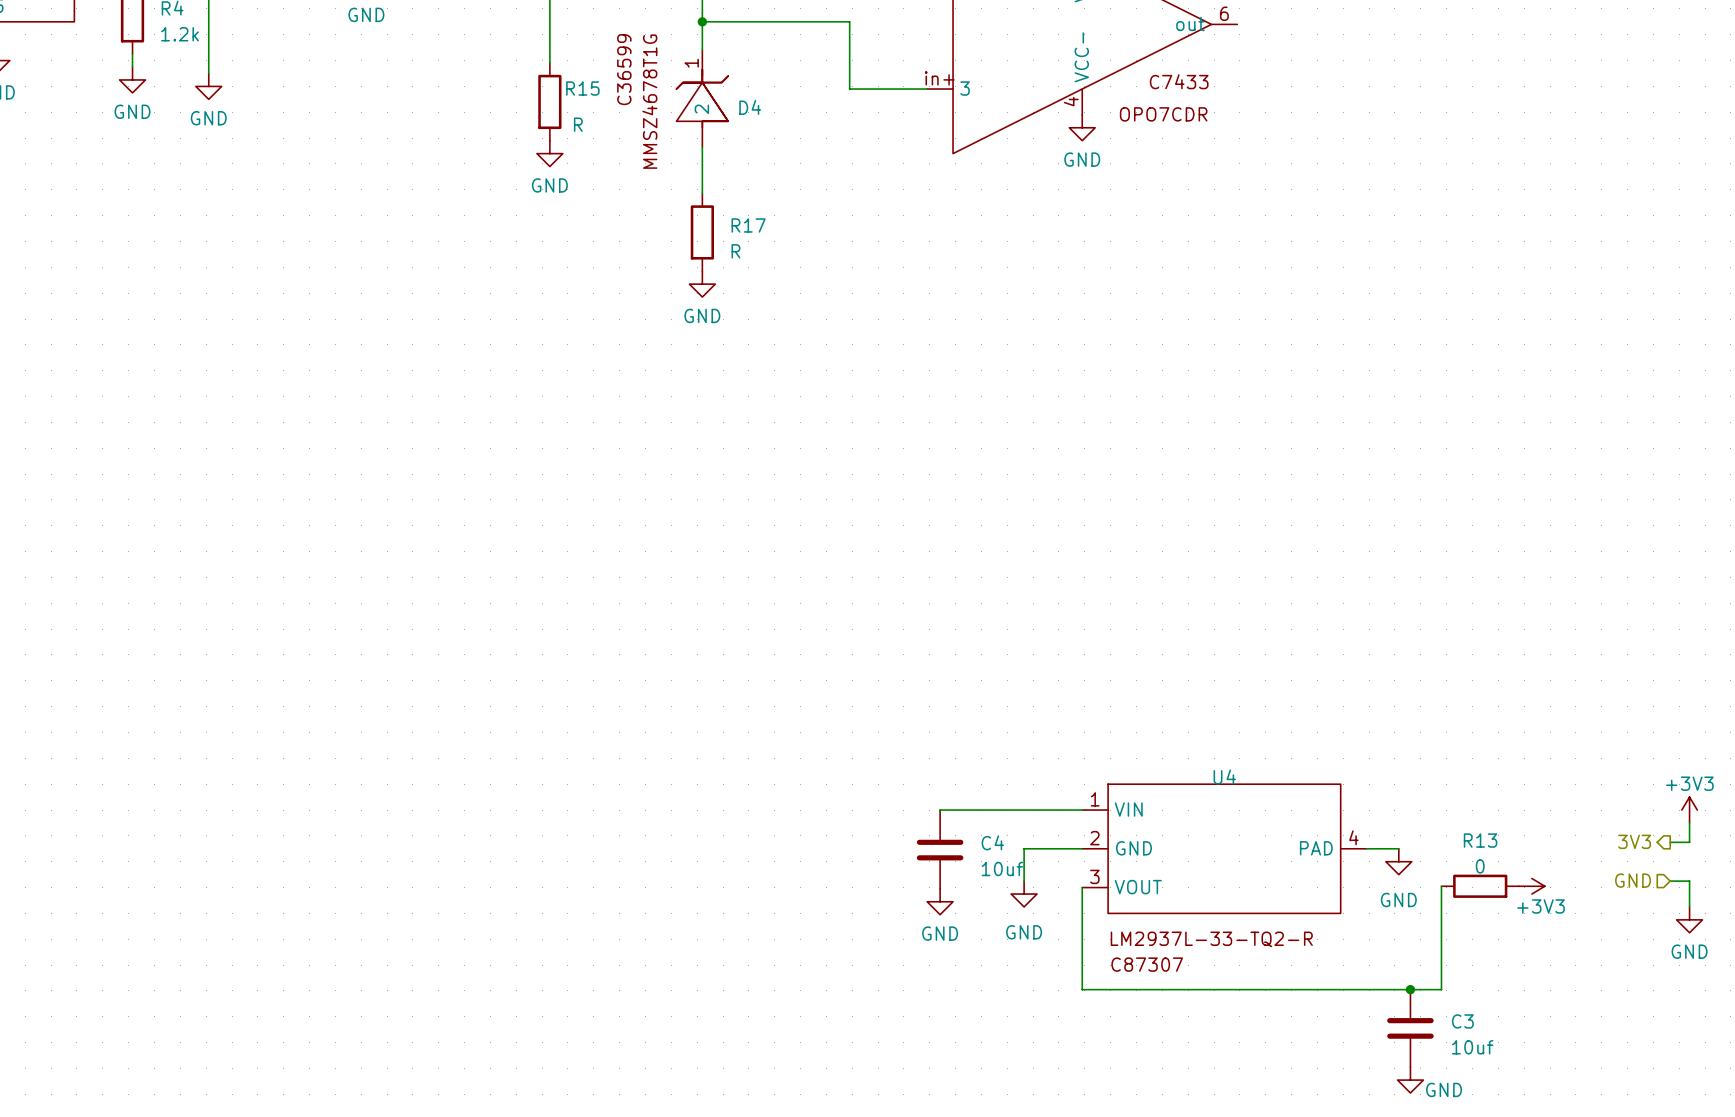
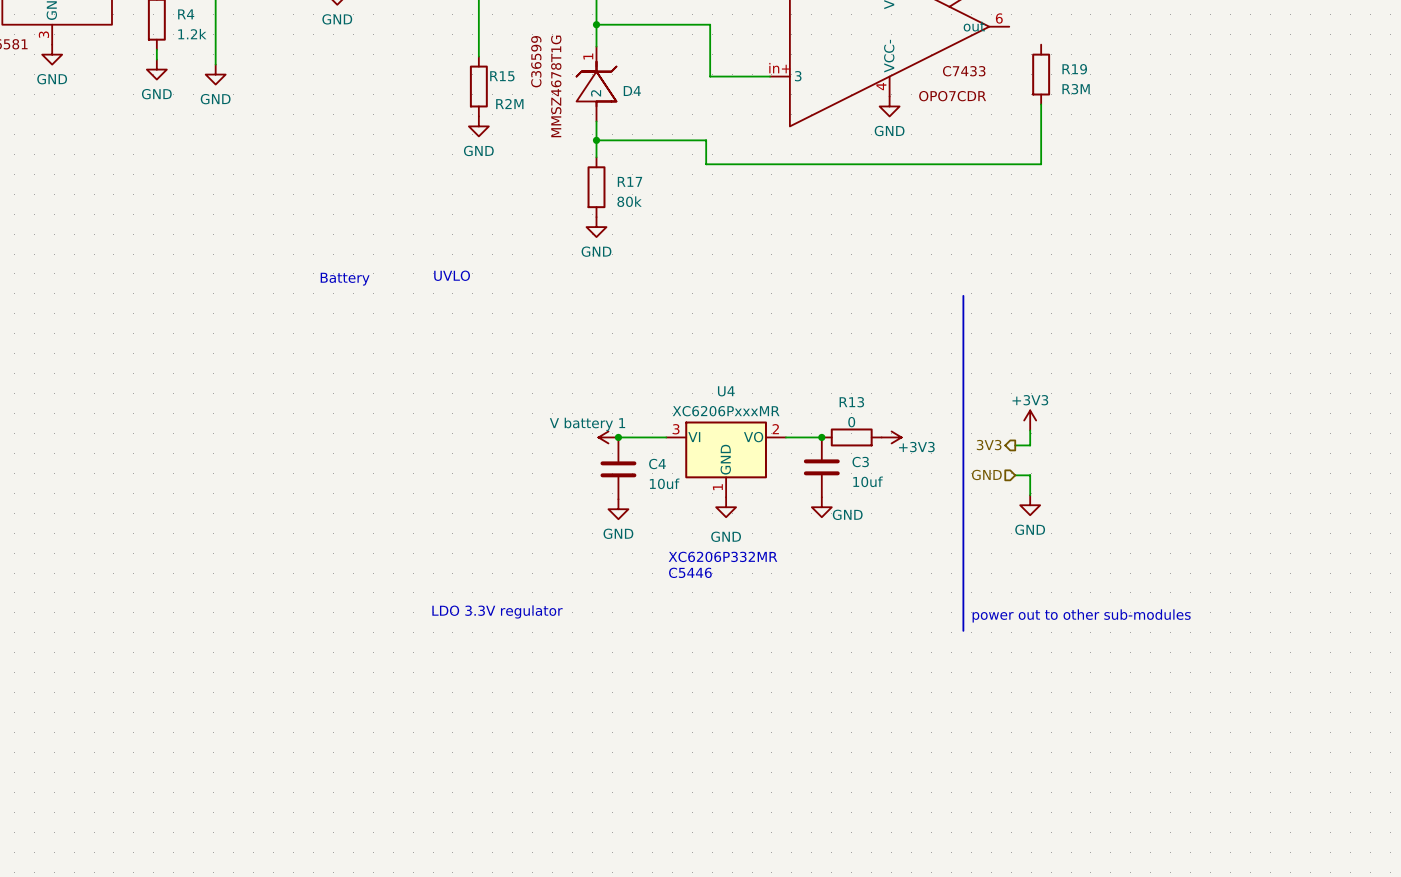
R19: none -> R3M (1041, 74)
R15 value: R (578, 124) -> R2M (509, 104)
wire: none -> (1041, 104) (1041, 164) (706, 164) (706, 140) (596, 140)
junction: none -> (596, 140)
R17 value: R (735, 251) -> 80k (629, 201)
text: none -> UVLO (452, 275)
text: none -> Battery (345, 279)
line: none -> (963, 295) (963, 630)
U4 value: none -> XC6206PxxxMR (726, 411)
power symbol: none -> +3V3 (1030, 420)
wire: none -> (1030, 430) (1030, 445) (1015, 445)
power symbol: none -> V battery 1 (608, 437)
junction: none -> (618, 437)
wire: none -> (666, 437) (618, 437) (618, 439)
wire: none -> (785, 437) (821, 437)
junction: none -> (821, 437)
power symbol: none -> +3V3 (891, 437)
hierarchical label: none -> 3V3 (989, 445)
hierarchical label: none -> GND (986, 474)
wire: none -> (1015, 475) (1030, 475) (1030, 495)
power symbol: none -> GND (1030, 505)
power symbol: none -> GND (726, 507)
power symbol: none -> GND (821, 507)
power symbol: none -> GND (618, 509)
text: none -> XC6206P332MR (722, 556)
text: none -> C5446 (690, 572)
text: none -> LDO 3.3V regulator (497, 611)
U4 symbol: [1082, 784, 1367, 914] -> [666, 421, 786, 498]
text: none -> power out to other sub-modules (1081, 615)
wire: (1082, 810) (940, 811) -> none
power symbol: +3V3 (1689, 810) -> none
wire: (1689, 822) (1689, 842) (1670, 842) -> none
hierarchical label: 3V3 (1634, 841) -> none
wire: (1082, 848) (1024, 848) (1024, 881) -> none
wire: (1366, 848) (1398, 848) -> none
C4 position: (940, 850) -> (618, 469)
power symbol: GND (1398, 861) -> none
hierarchical label: GND (1633, 880) -> none
wire: (1670, 881) (1689, 881) (1689, 906) -> none
wire: (1441, 886) (1441, 989) (1082, 989) (1082, 887) -> none
R13 position: (1480, 886) -> (851, 437)
power symbol: +3V3 (1531, 886) -> none
power symbol: GND (1024, 894) -> none
power symbol: GND (940, 901) -> none
power symbol: GND (1689, 919) -> none
junction: (1410, 989) -> none
C3 position: (1410, 1028) -> (821, 467)
power symbol: GND (1410, 1080) -> none

